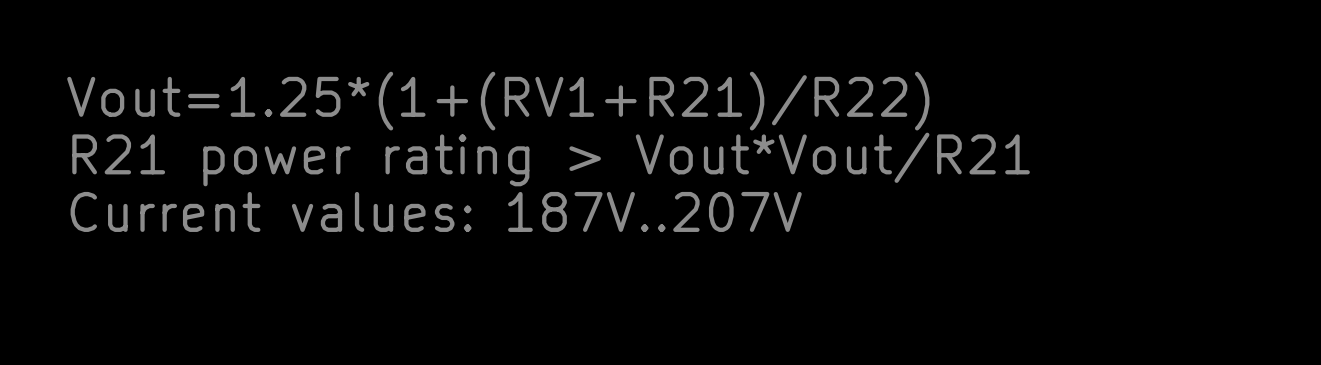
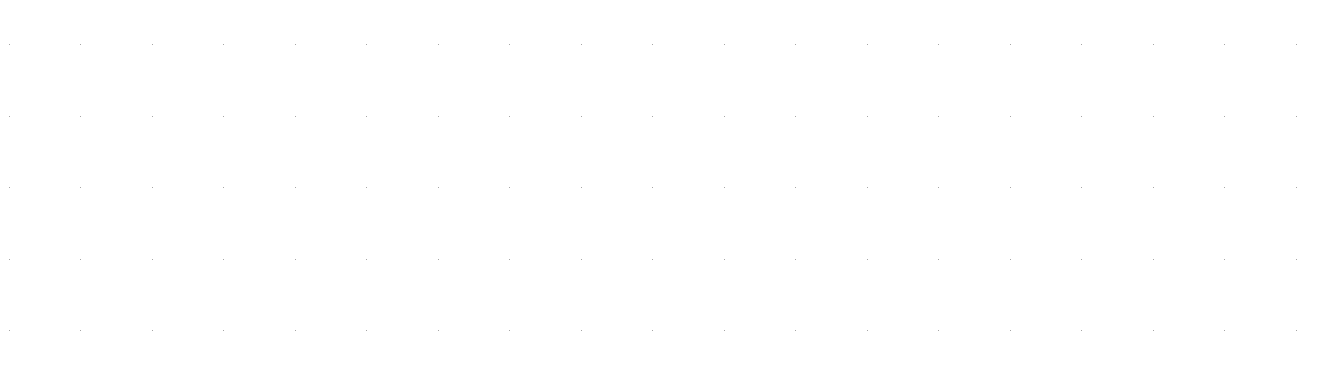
text: Vout=1.25*(1+(RV1+R21)/R22) (498, 101) -> none
text: R21 power rating > Vout*Vout/R21 (551, 159) -> none
text: Current values: 187V..207V (436, 211) -> none

